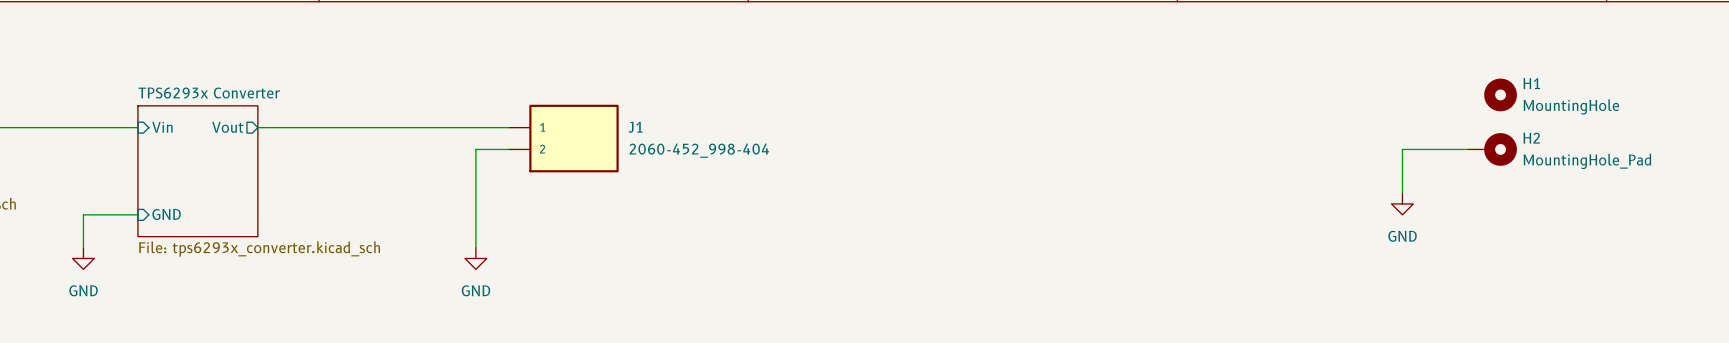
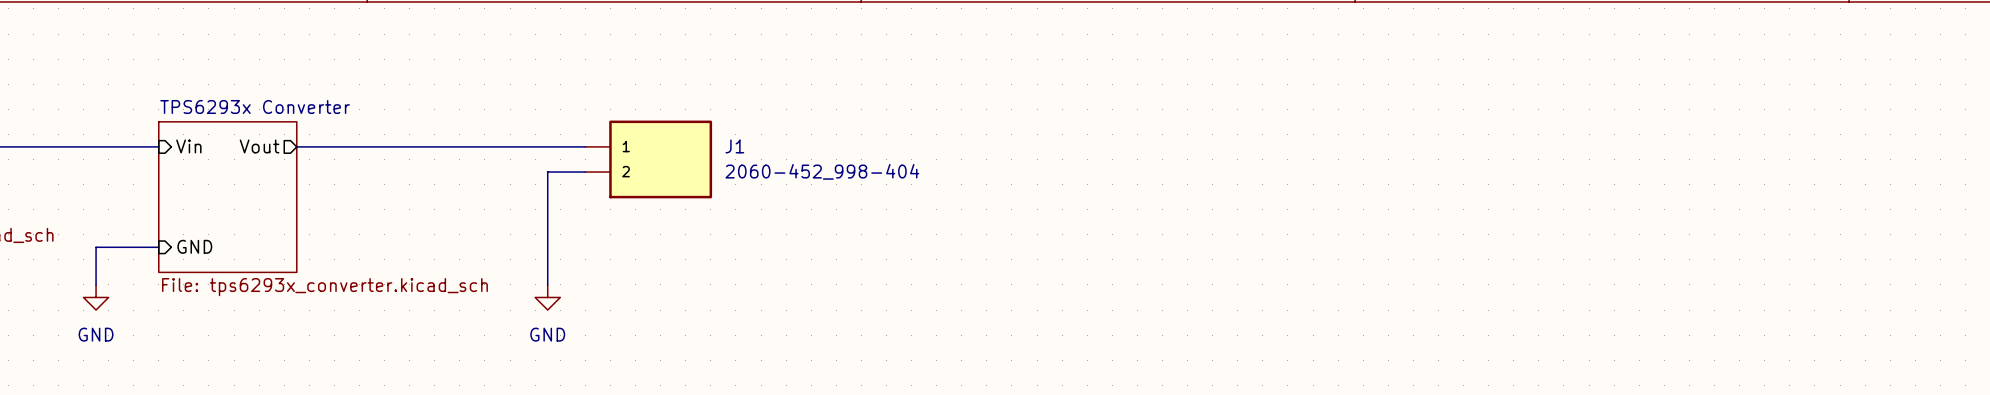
H1: MountingHole (1500, 94) -> none
wire: (1467, 149) (1402, 149) (1402, 193) -> none
H2: MountingHole_Pad (1492, 149) -> none
power symbol: GND (1402, 203) -> none

